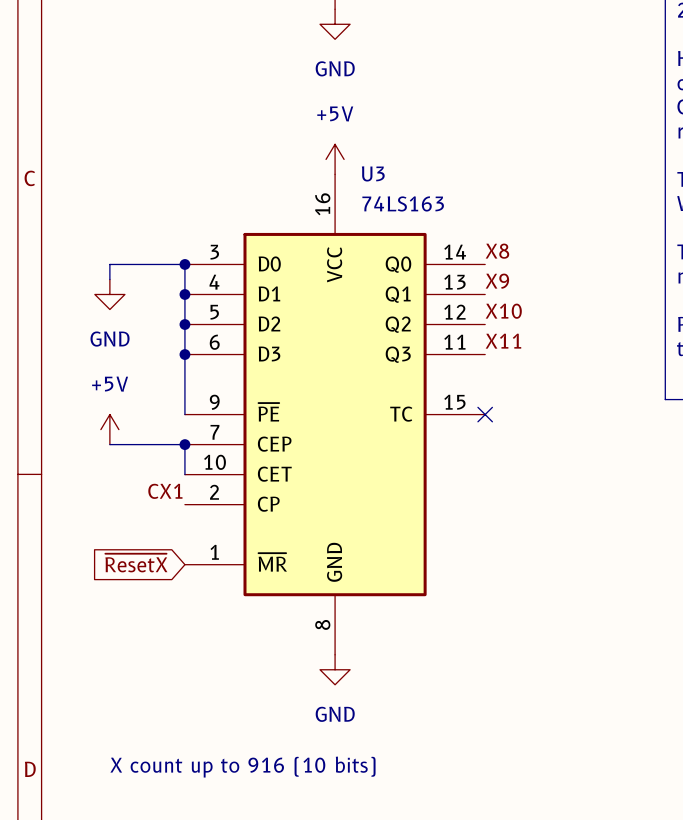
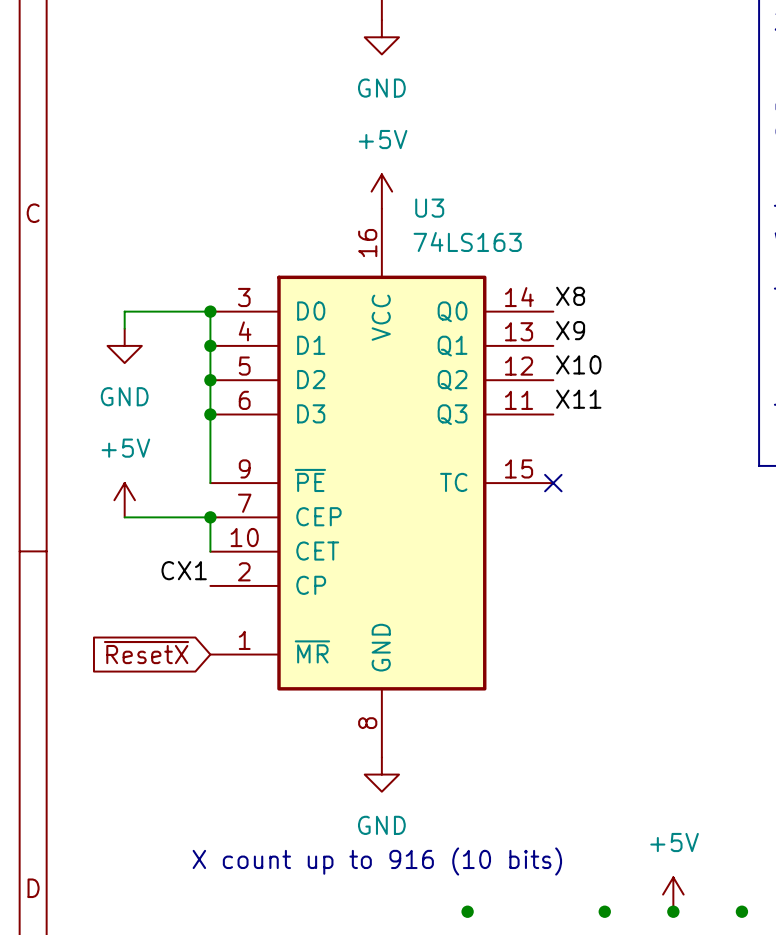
text position: X count up to 916 (10 bits) (242, 767) -> X count up to 916 (10 bits) (377, 861)
power symbol: none -> +5V (673, 894)
junction: none -> (467, 911)
junction: none -> (604, 911)
junction: none -> (673, 911)
junction: none -> (741, 911)

